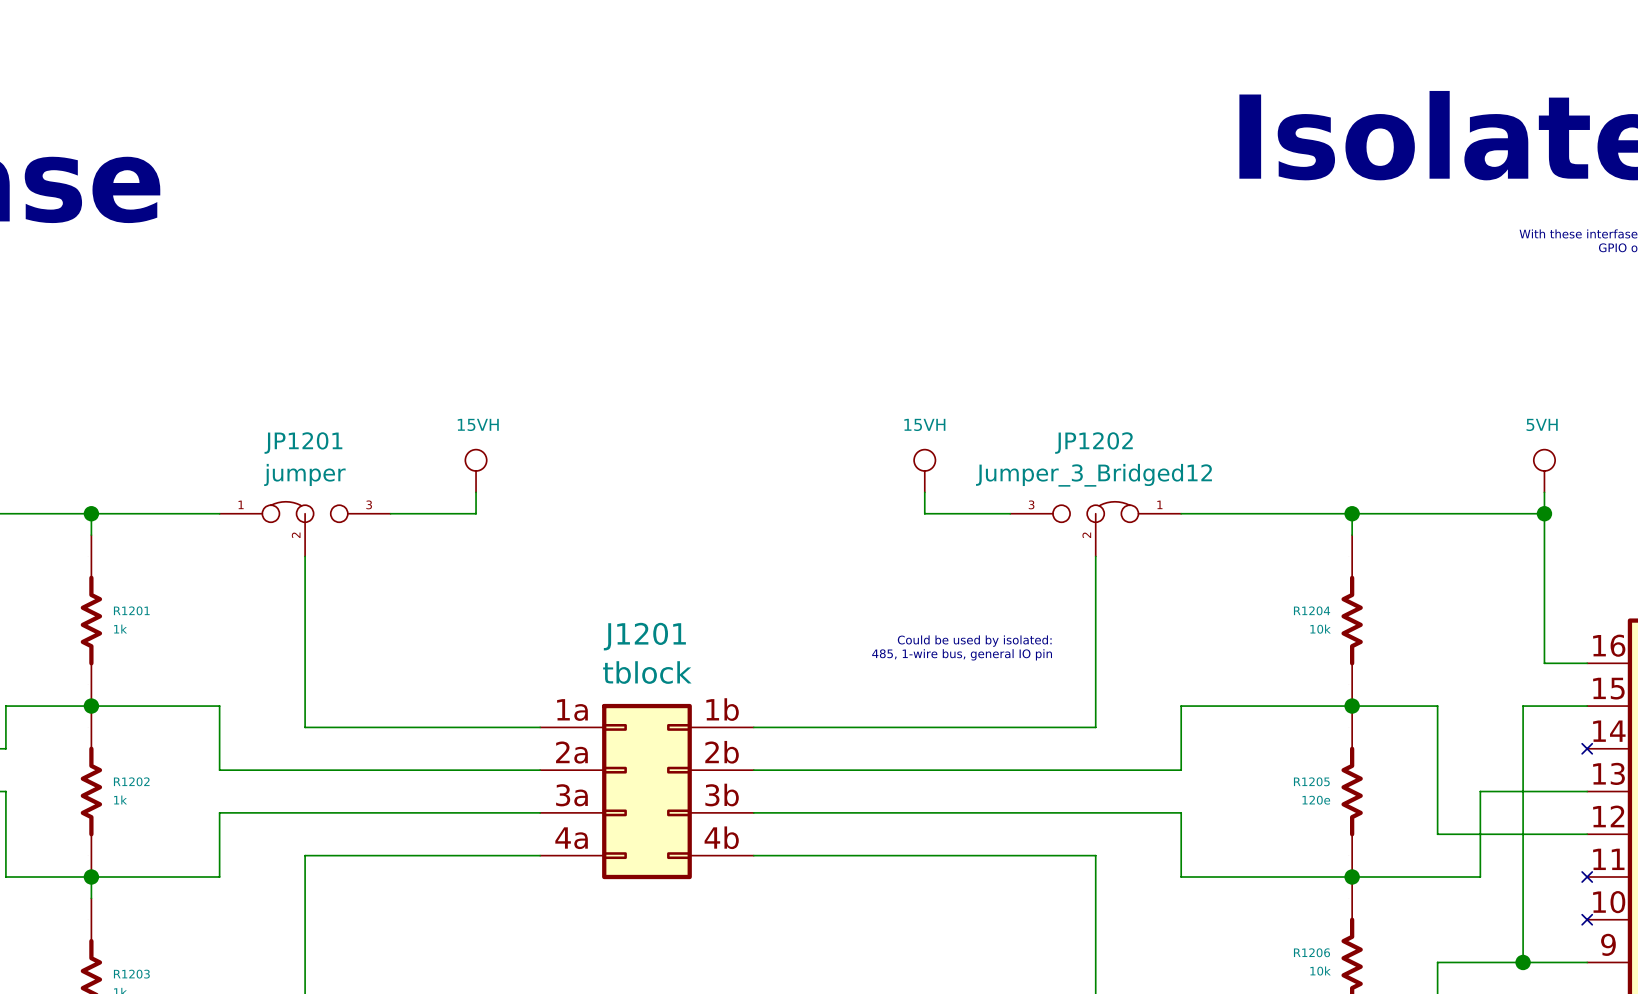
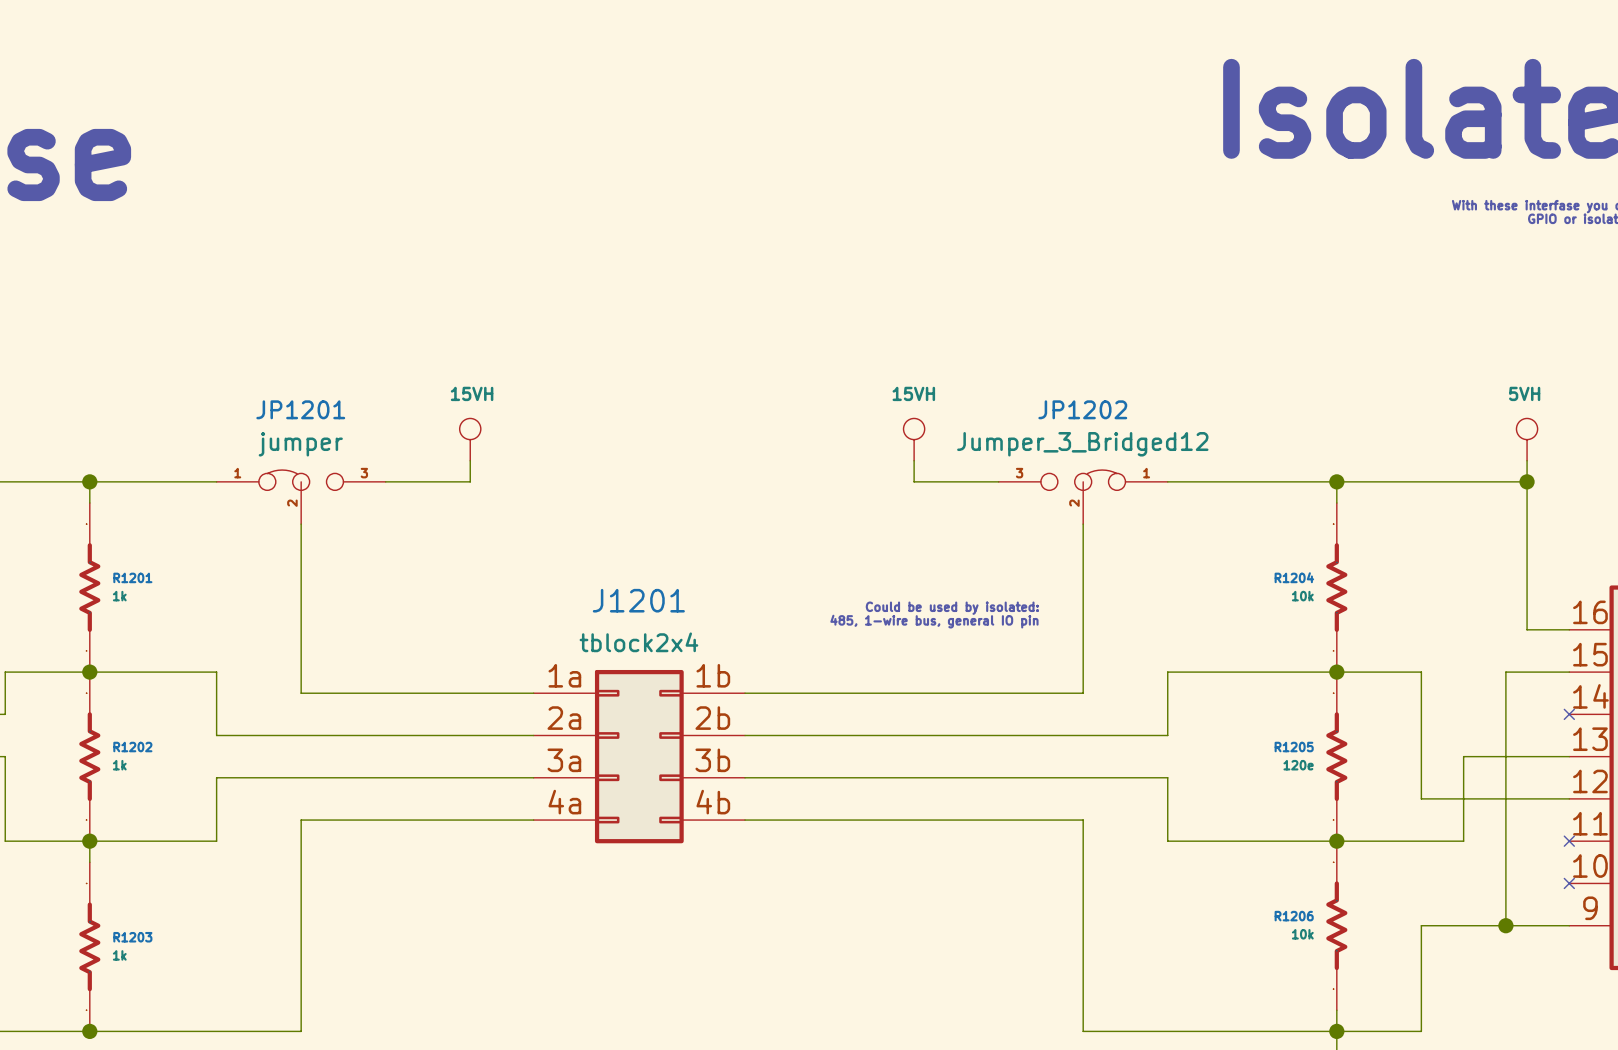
J1201 value: tblock (647, 672) -> tblock2x4 (638, 642)

